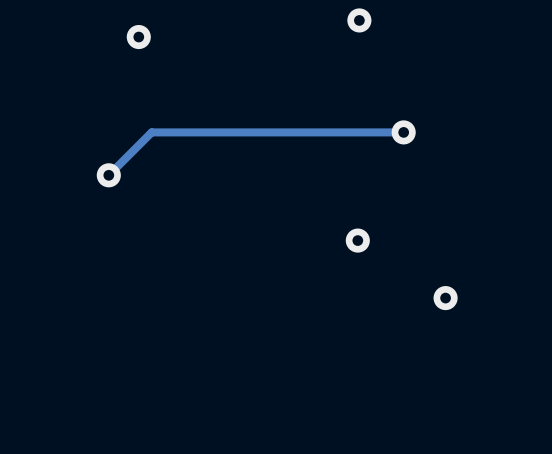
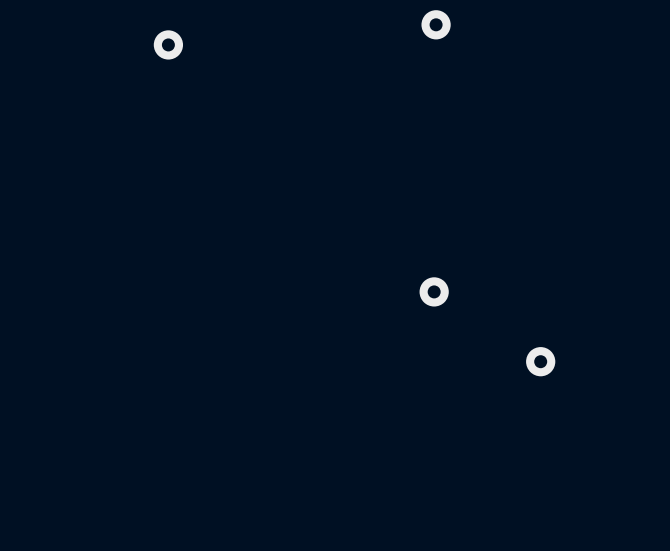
track: (403, 132) (151, 132) (108, 175) -> none
via: (403, 132) -> none
via: (108, 175) -> none

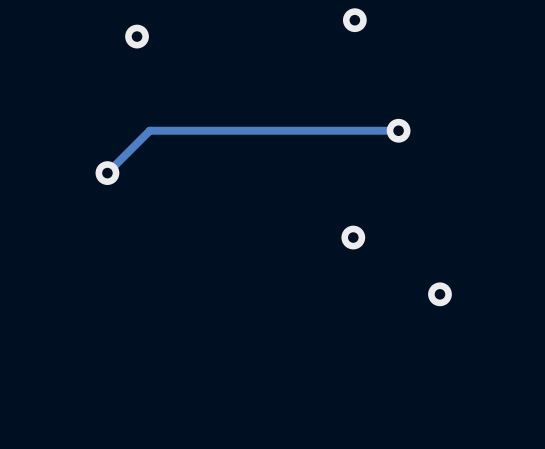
track: none -> (398, 130) (149, 130) (107, 173)
via: none -> (398, 130)
via: none -> (107, 173)

